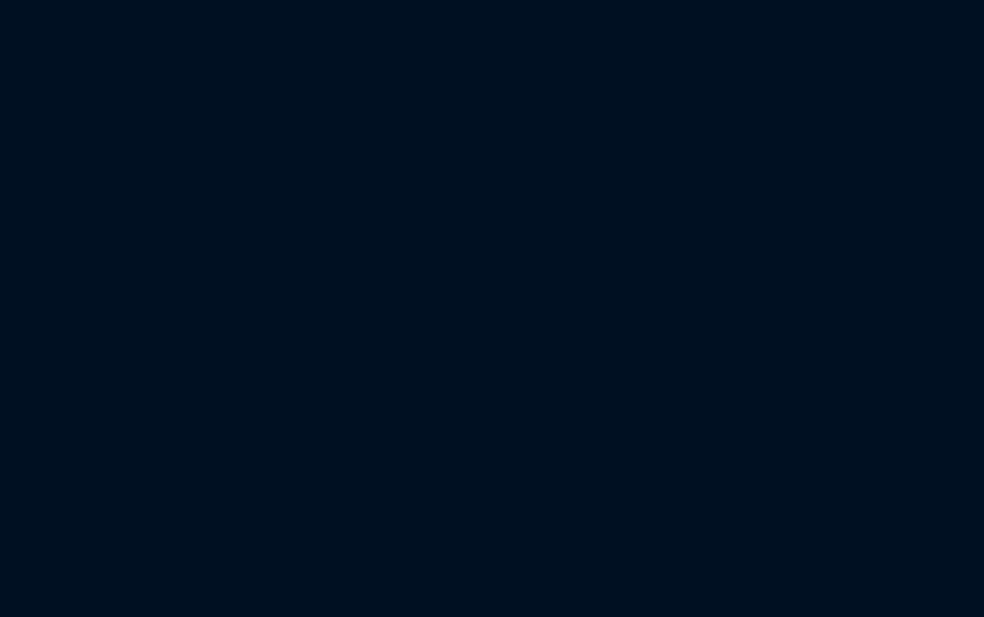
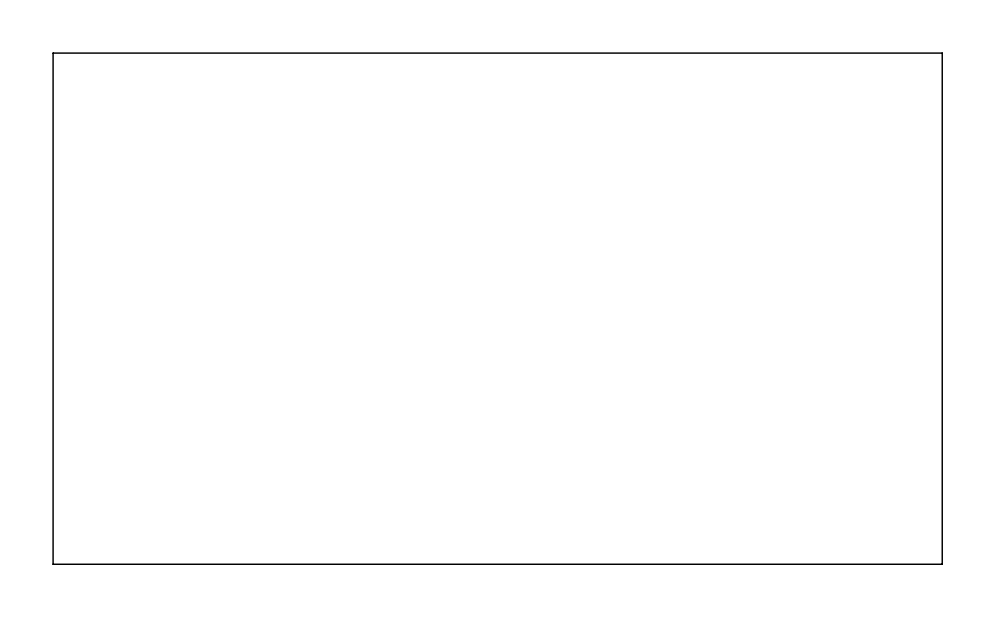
board edge: none -> (942, 53) (53, 53) (53, 564) (942, 564) (942, 53)

